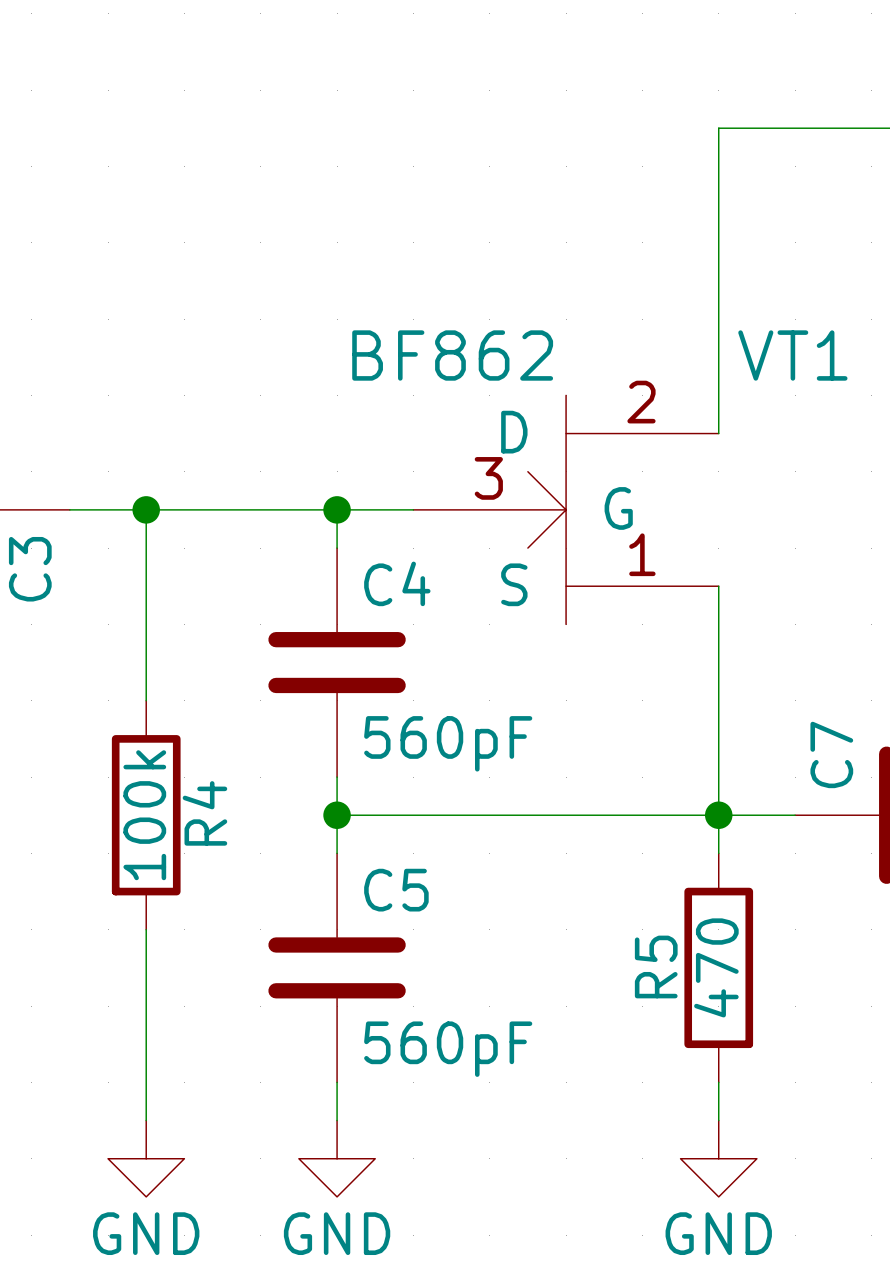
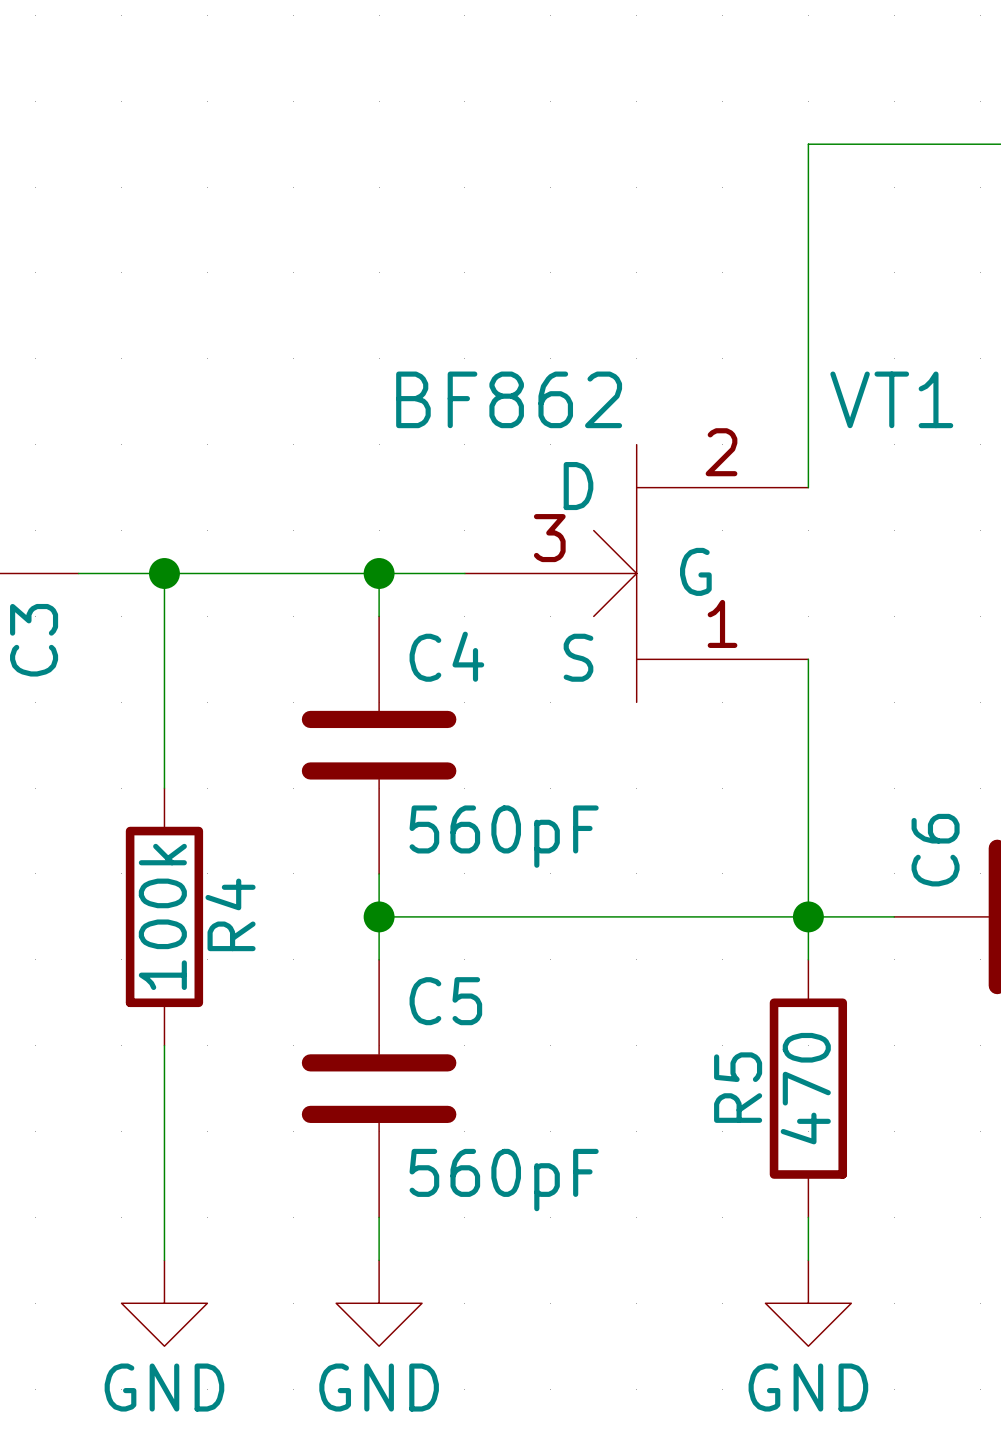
C7 name: C7 (831, 754) -> C6 (935, 850)

